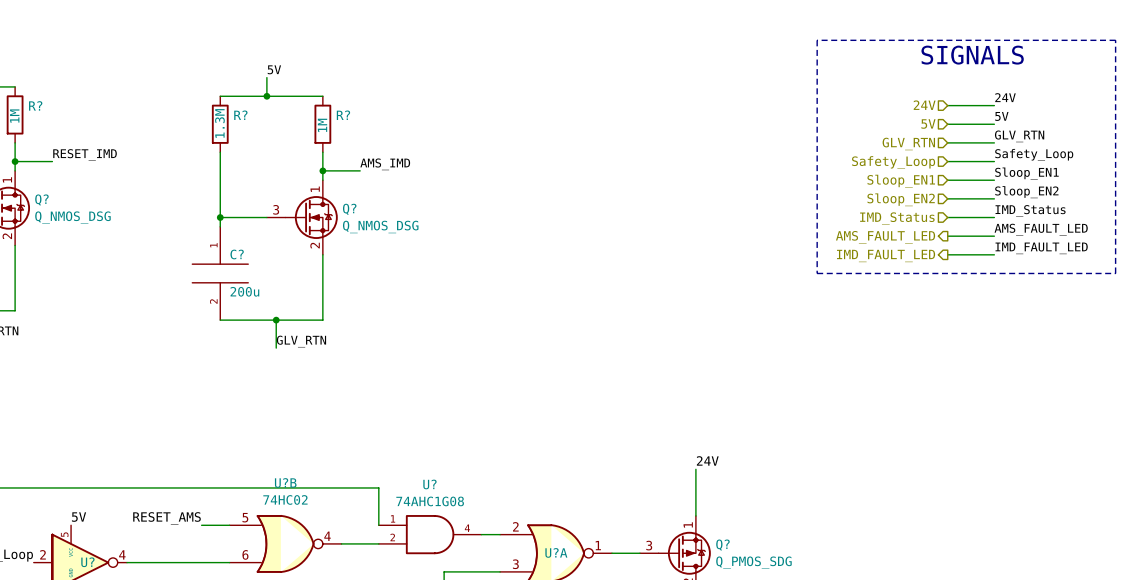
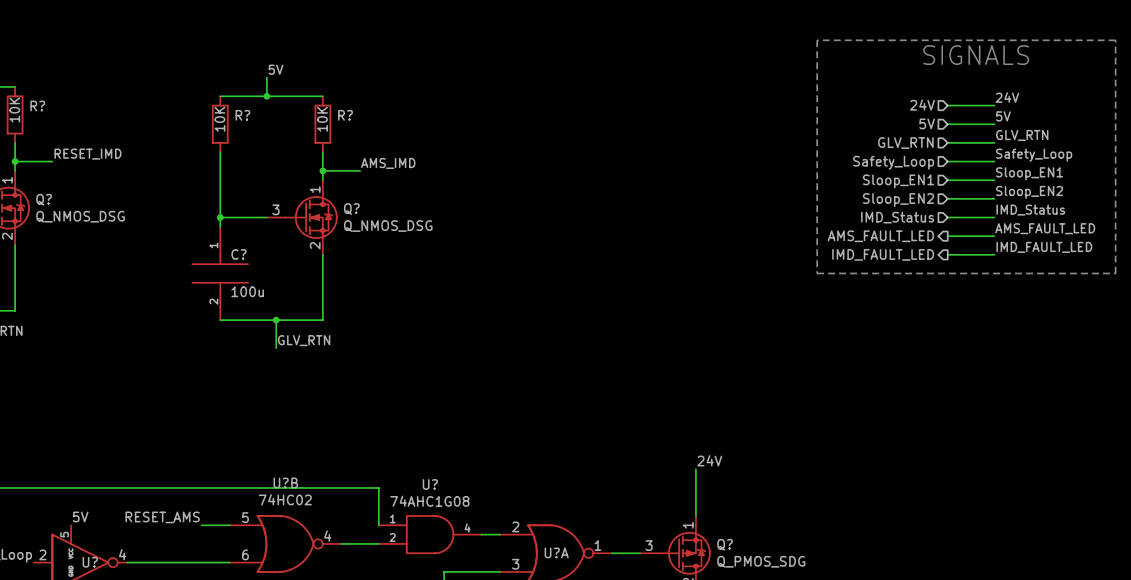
R? value: 1M (14, 116) -> 10K (14, 109)
R? value: 1.3M (219, 123) -> 10K (219, 119)
R? value: 1M (322, 125) -> 10K (322, 119)
C? value: 200u (244, 291) -> 100u (247, 291)

